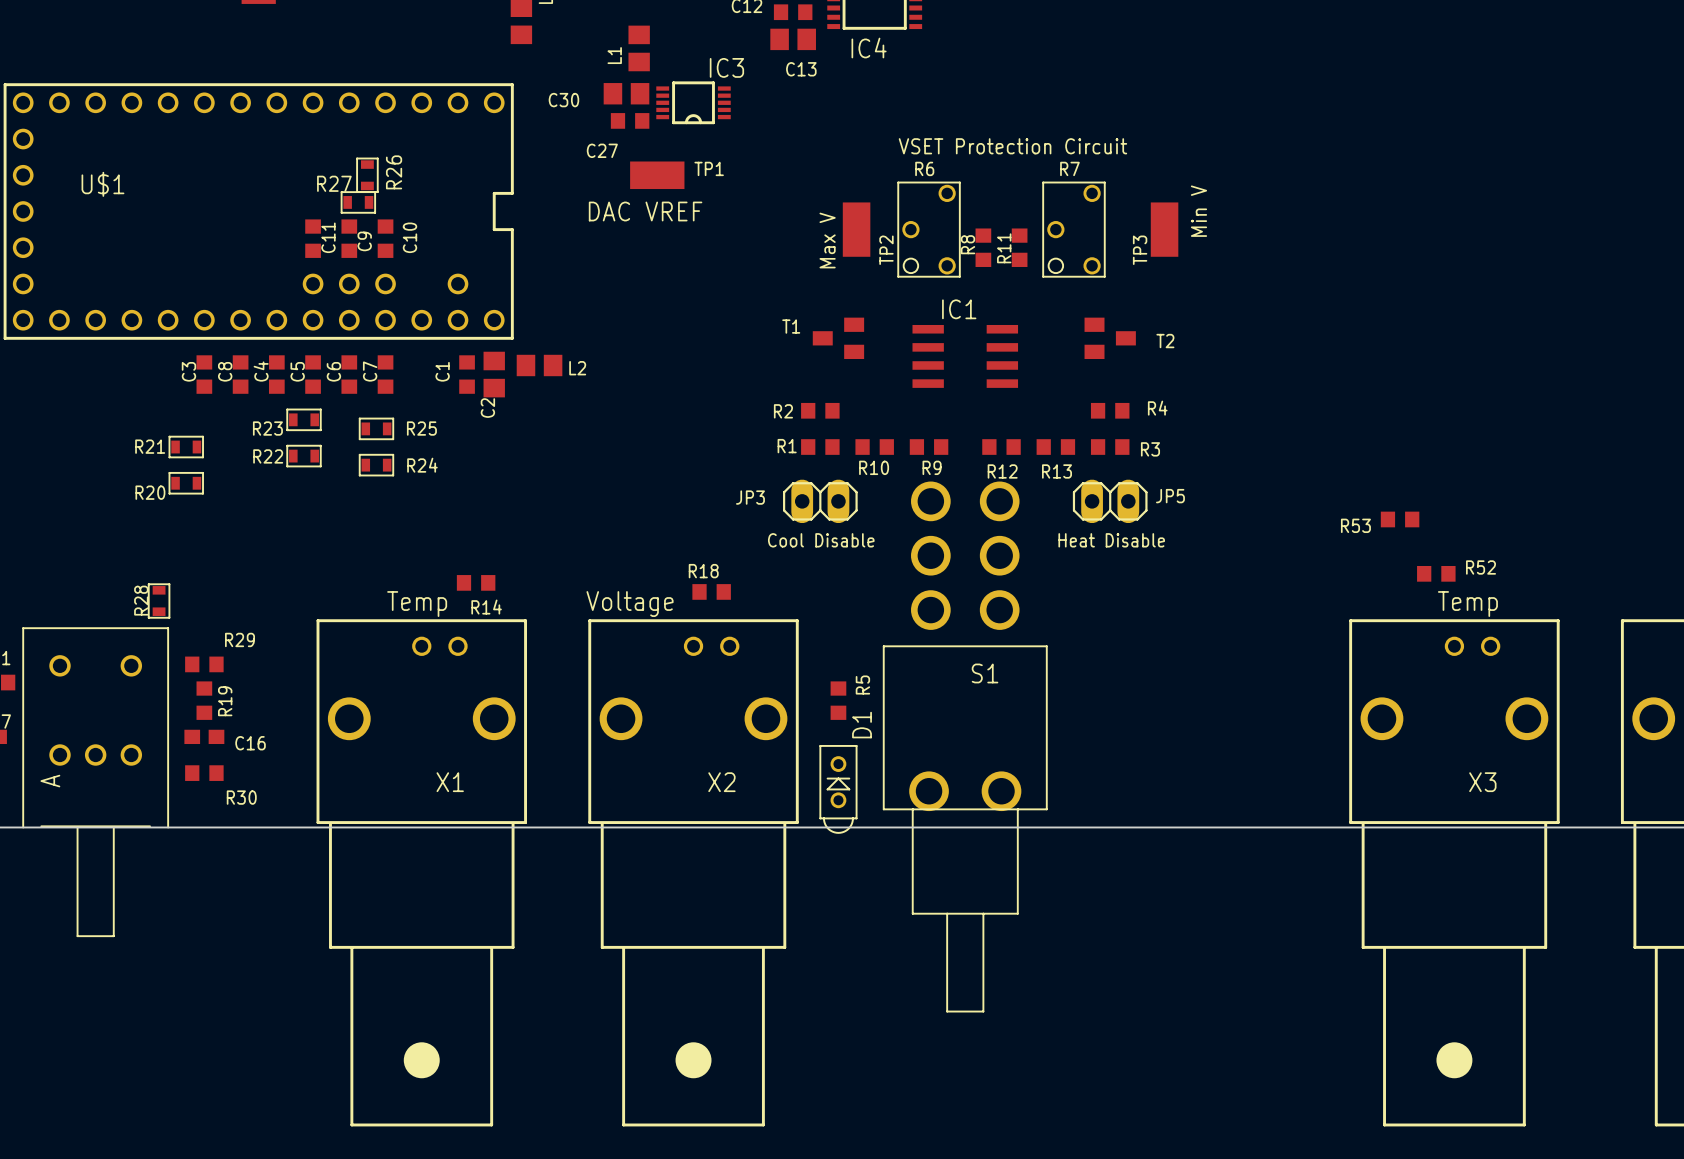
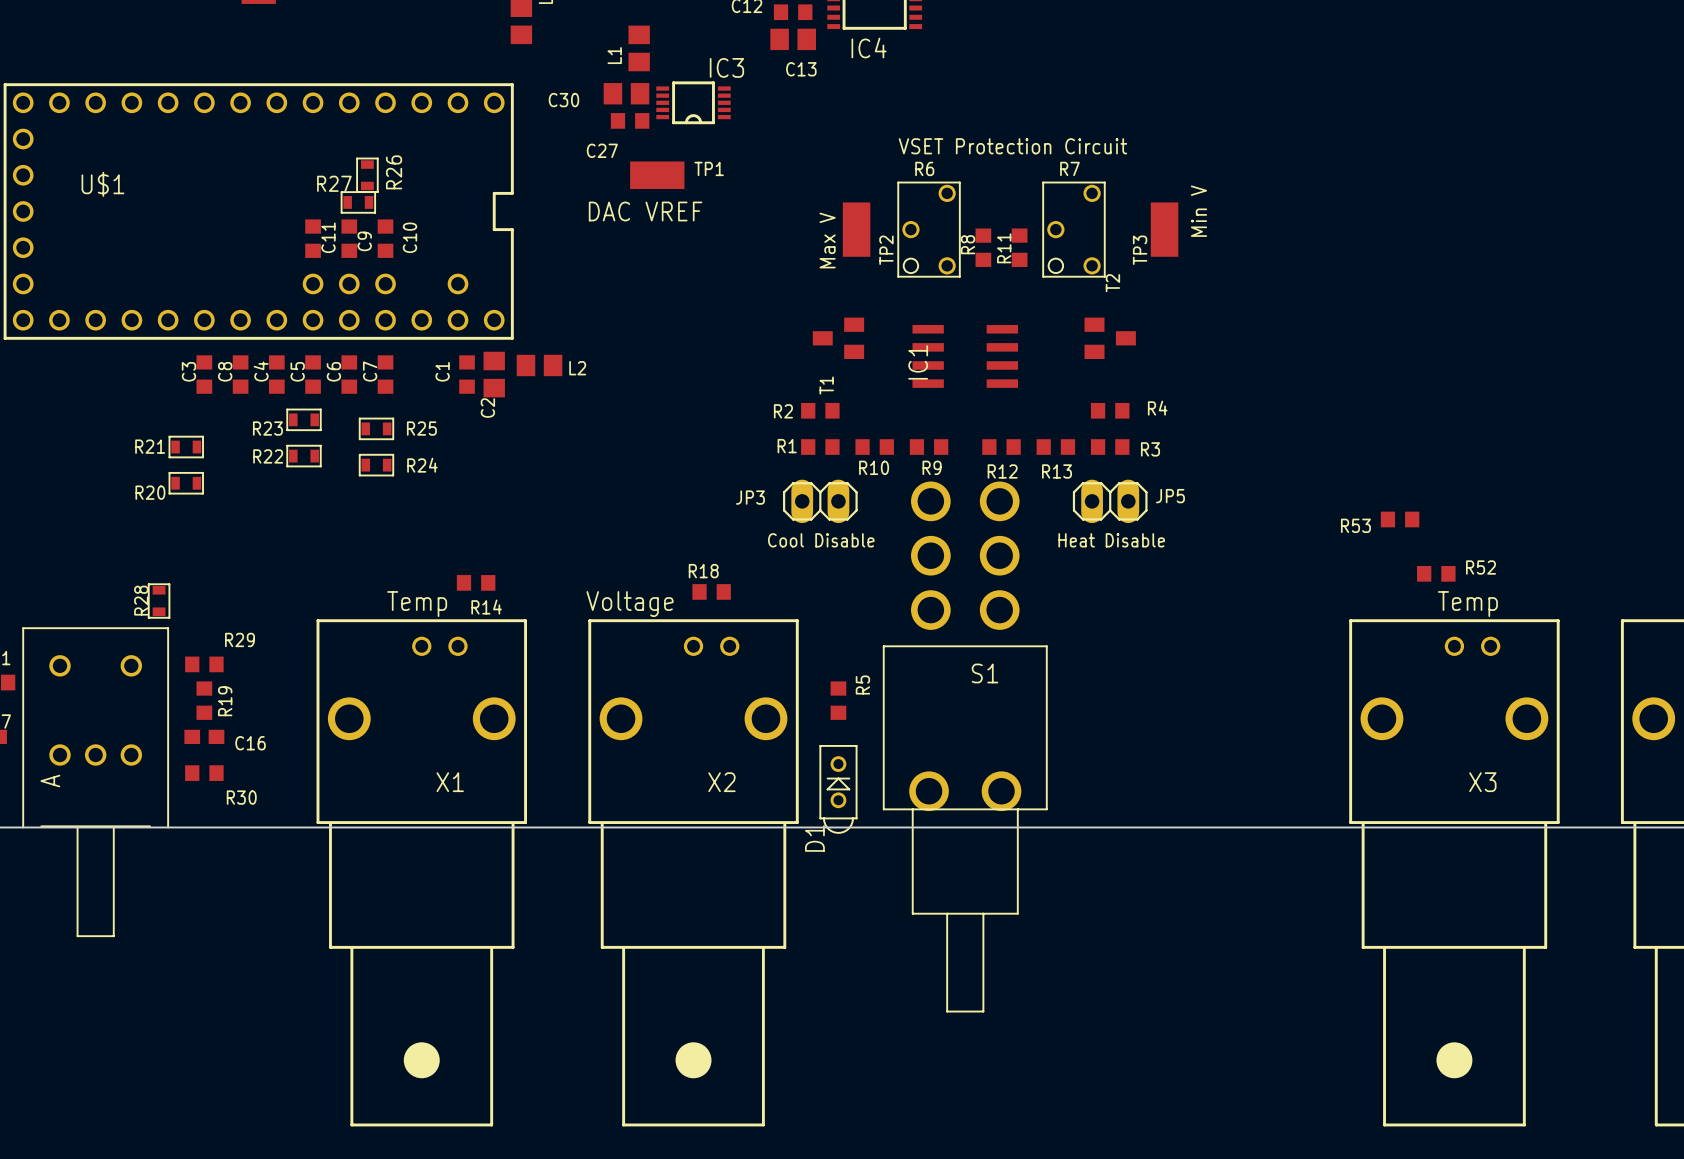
IC1 name rotation: 0° (959, 309) -> 90° counterclockwise (918, 362)
IC1 name position: IC1 (959, 309) -> IC1 (918, 362)
T1 name rotation: 0° (791, 326) -> 90° counterclockwise (826, 385)
T1 name position: T1 (791, 326) -> T1 (826, 385)
T2 name rotation: 0° (1165, 341) -> 90° counterclockwise (1112, 283)
T2 name position: T2 (1165, 341) -> T2 (1112, 283)
D1 name position: D1 (862, 725) -> D1 (814, 838)

